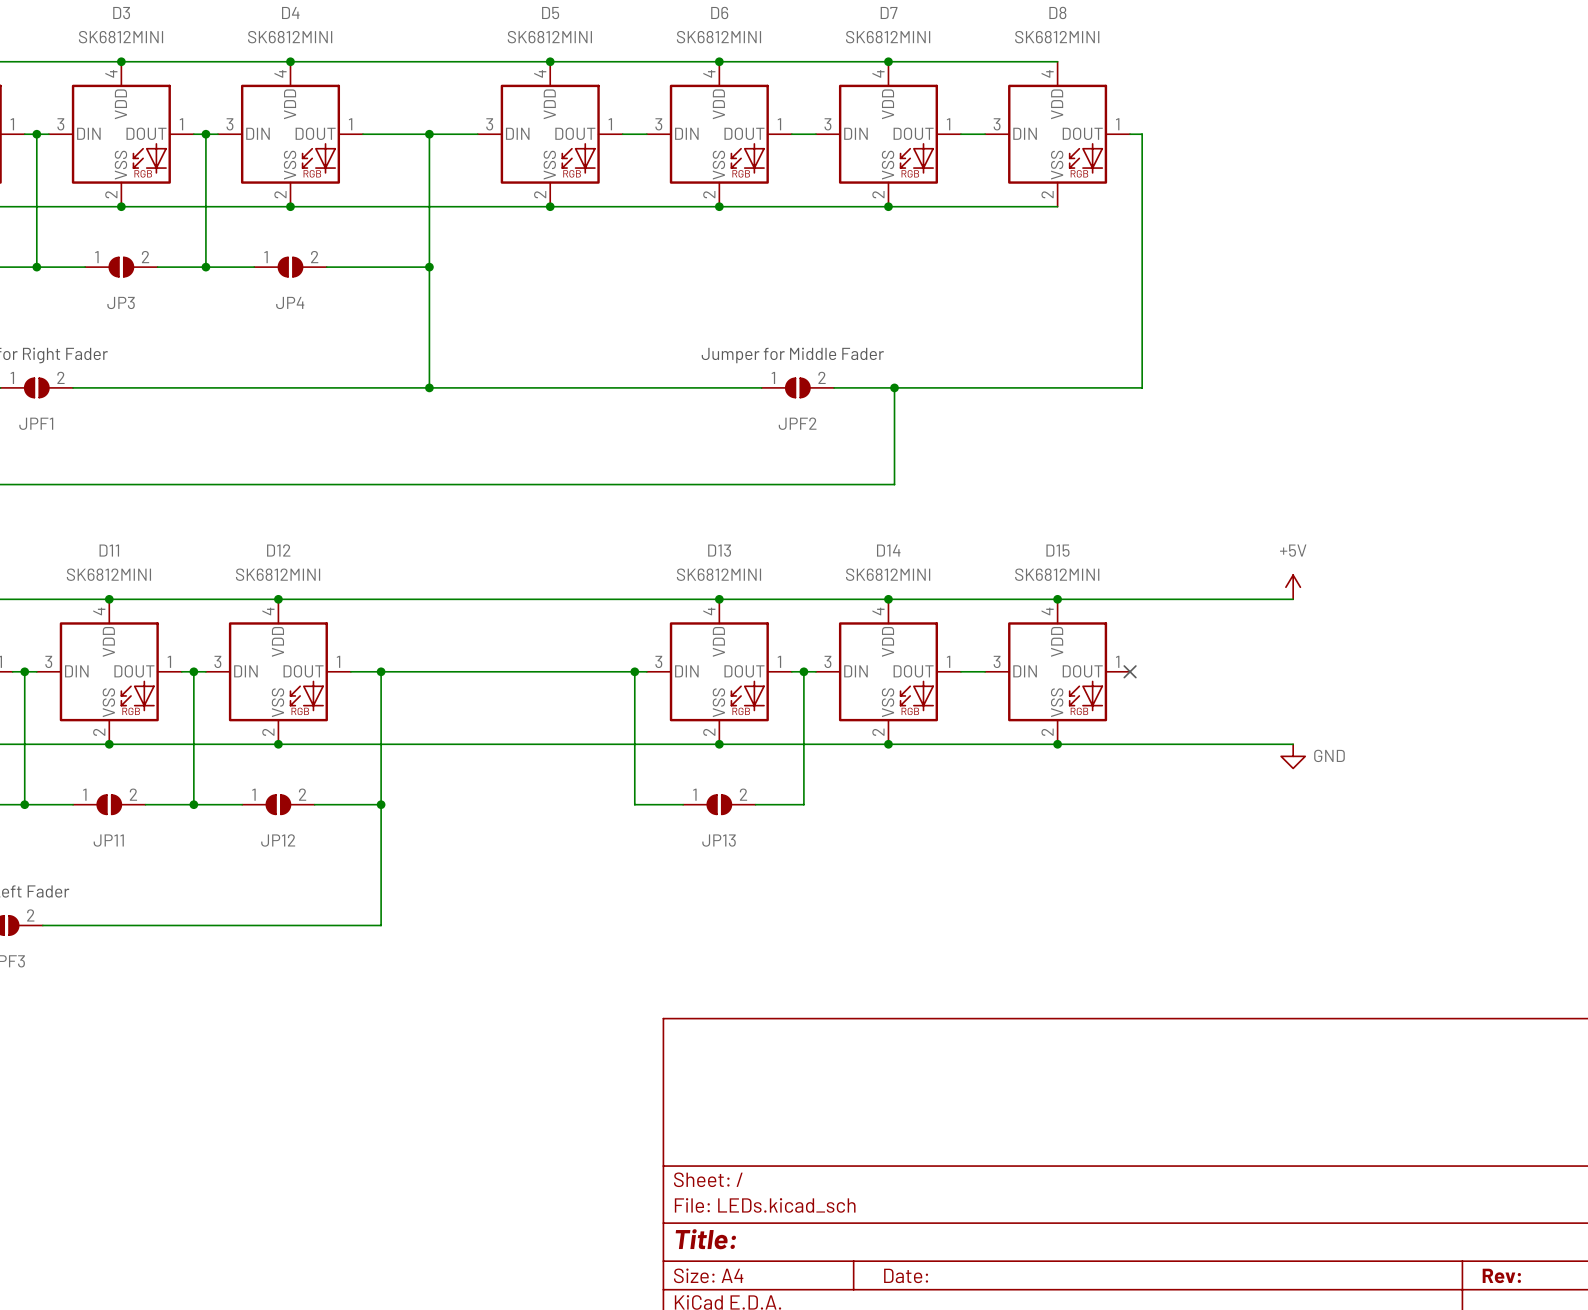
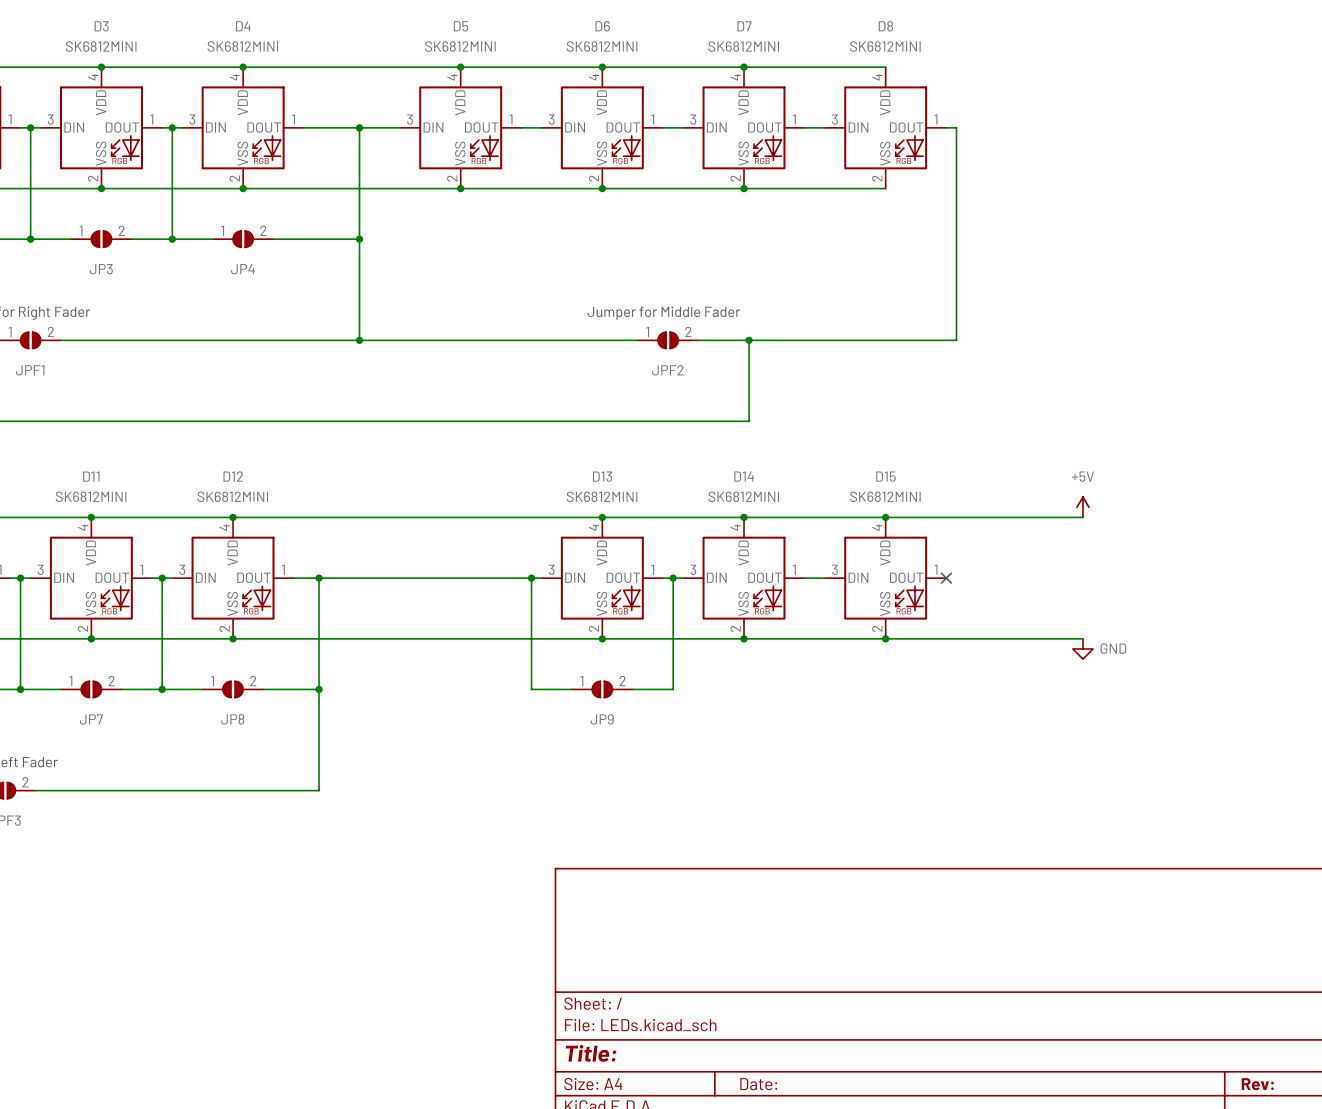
JP11 name: JP11 (108, 840) -> JP7 (91, 719)
JP12 name: JP12 (278, 840) -> JP8 (232, 719)
JP13 name: JP13 (719, 840) -> JP9 (602, 719)

